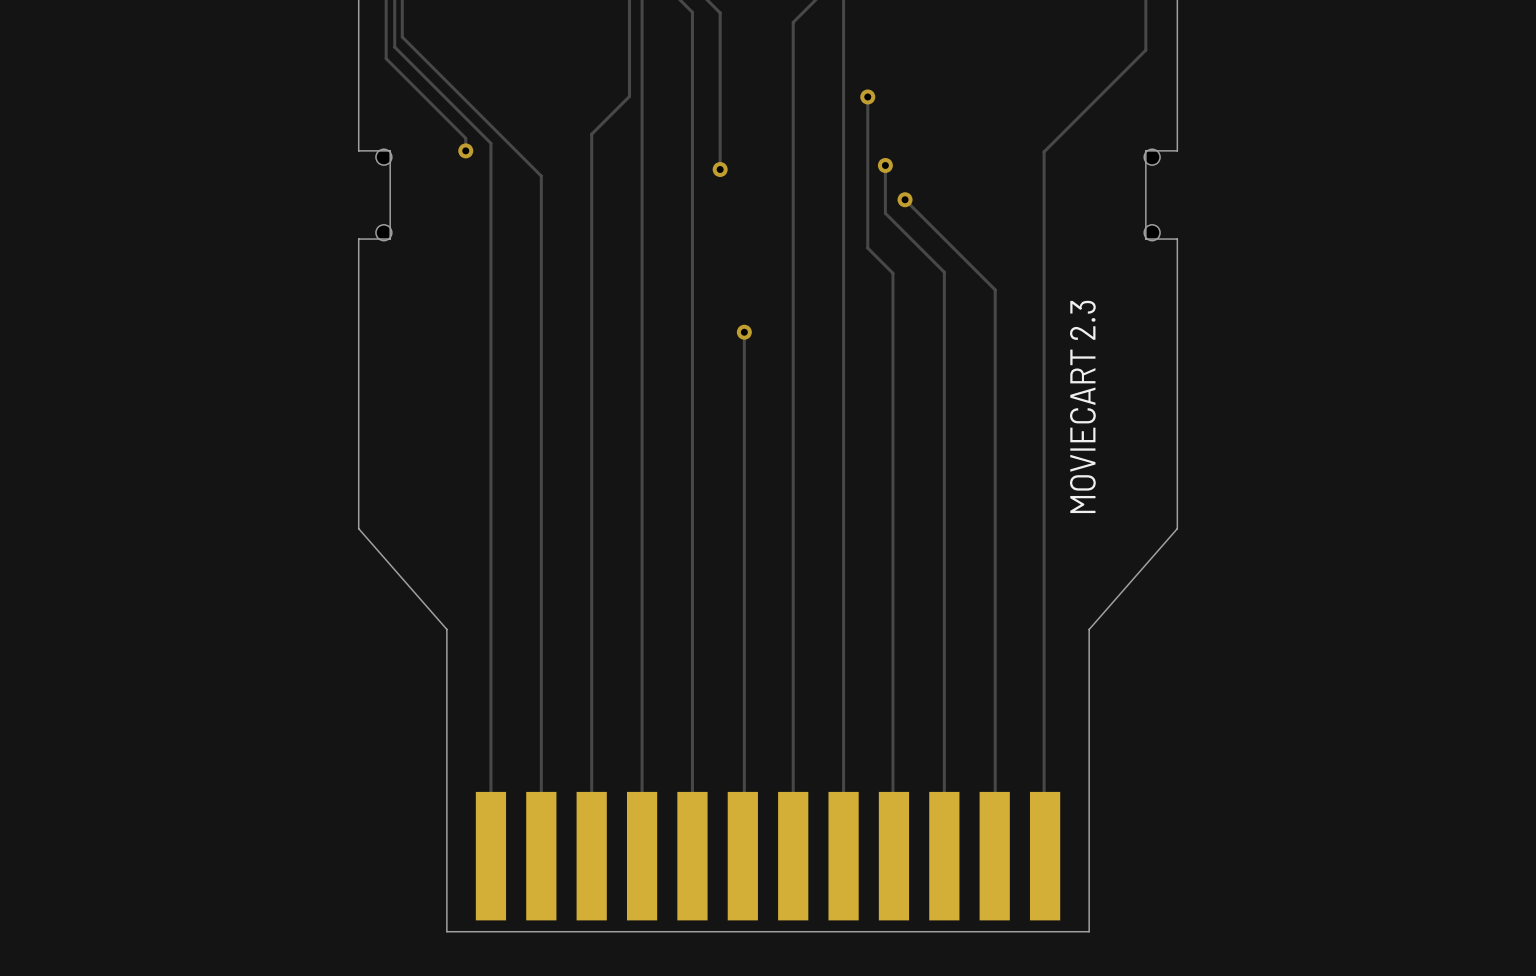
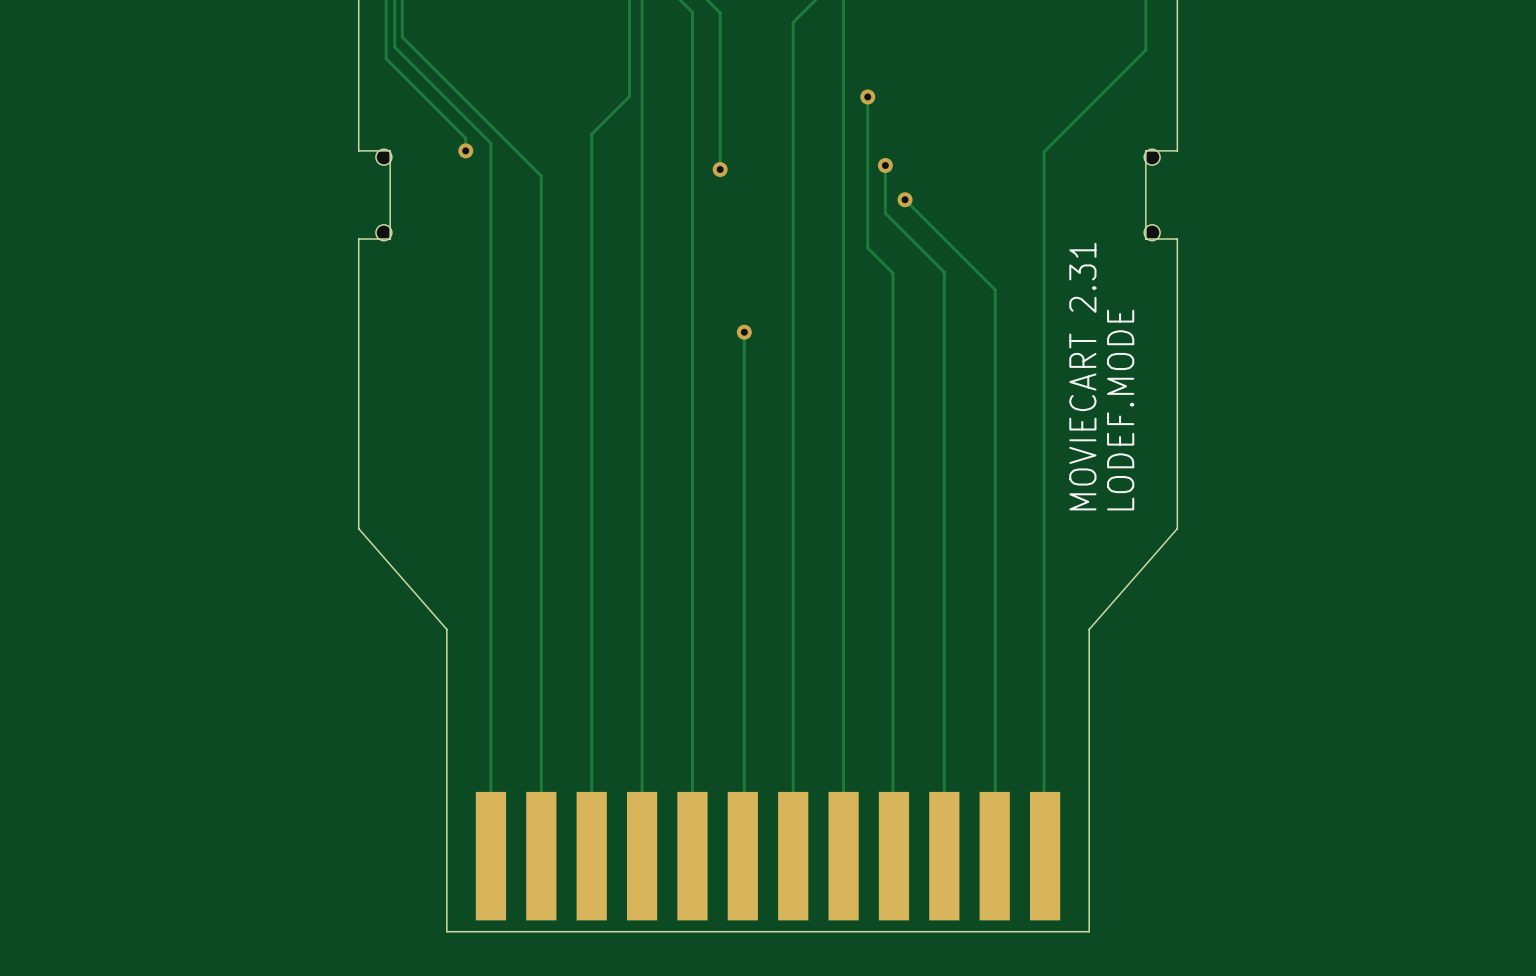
text: MOVIECART 2.3 (1082, 406) -> MOVIECART 2.31 (1082, 376)
text: none -> LODEF.MODE (1120, 410)

